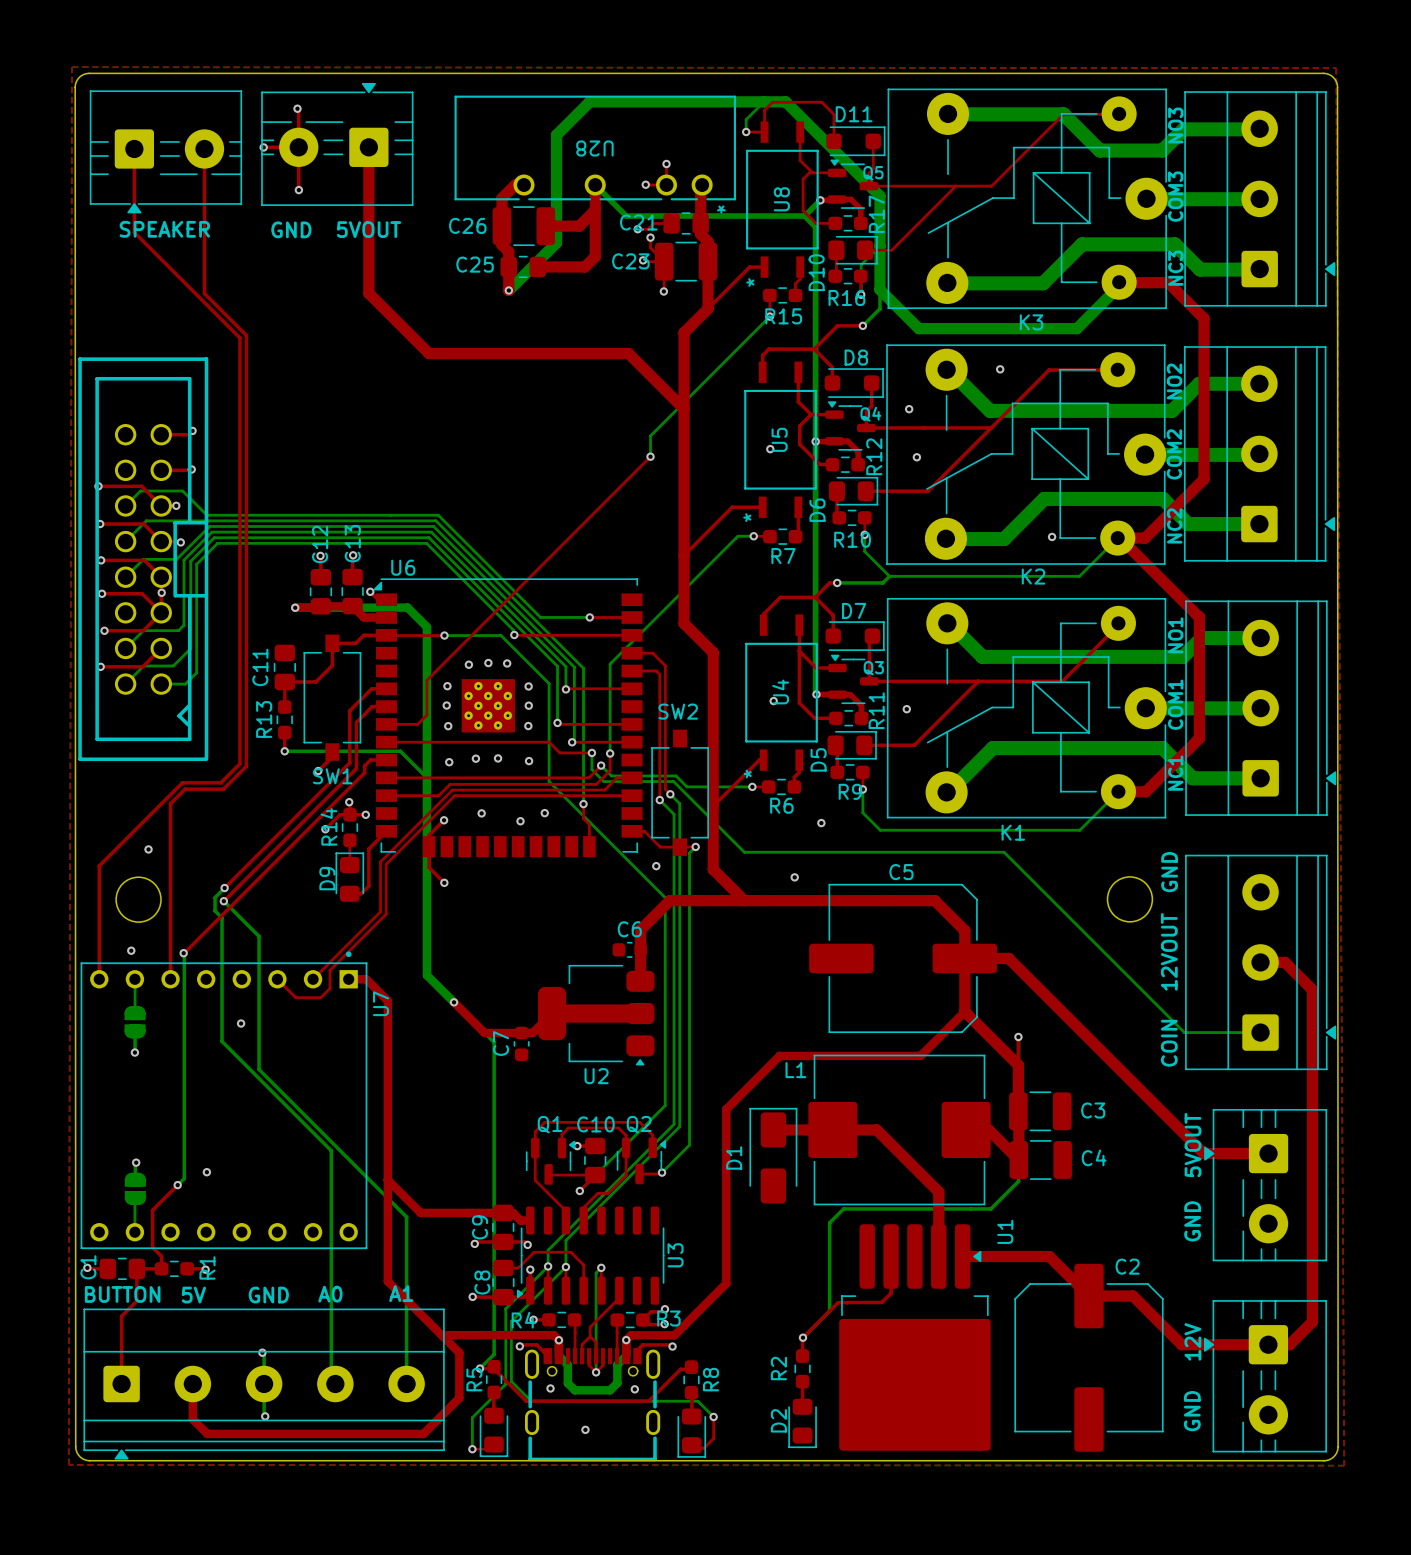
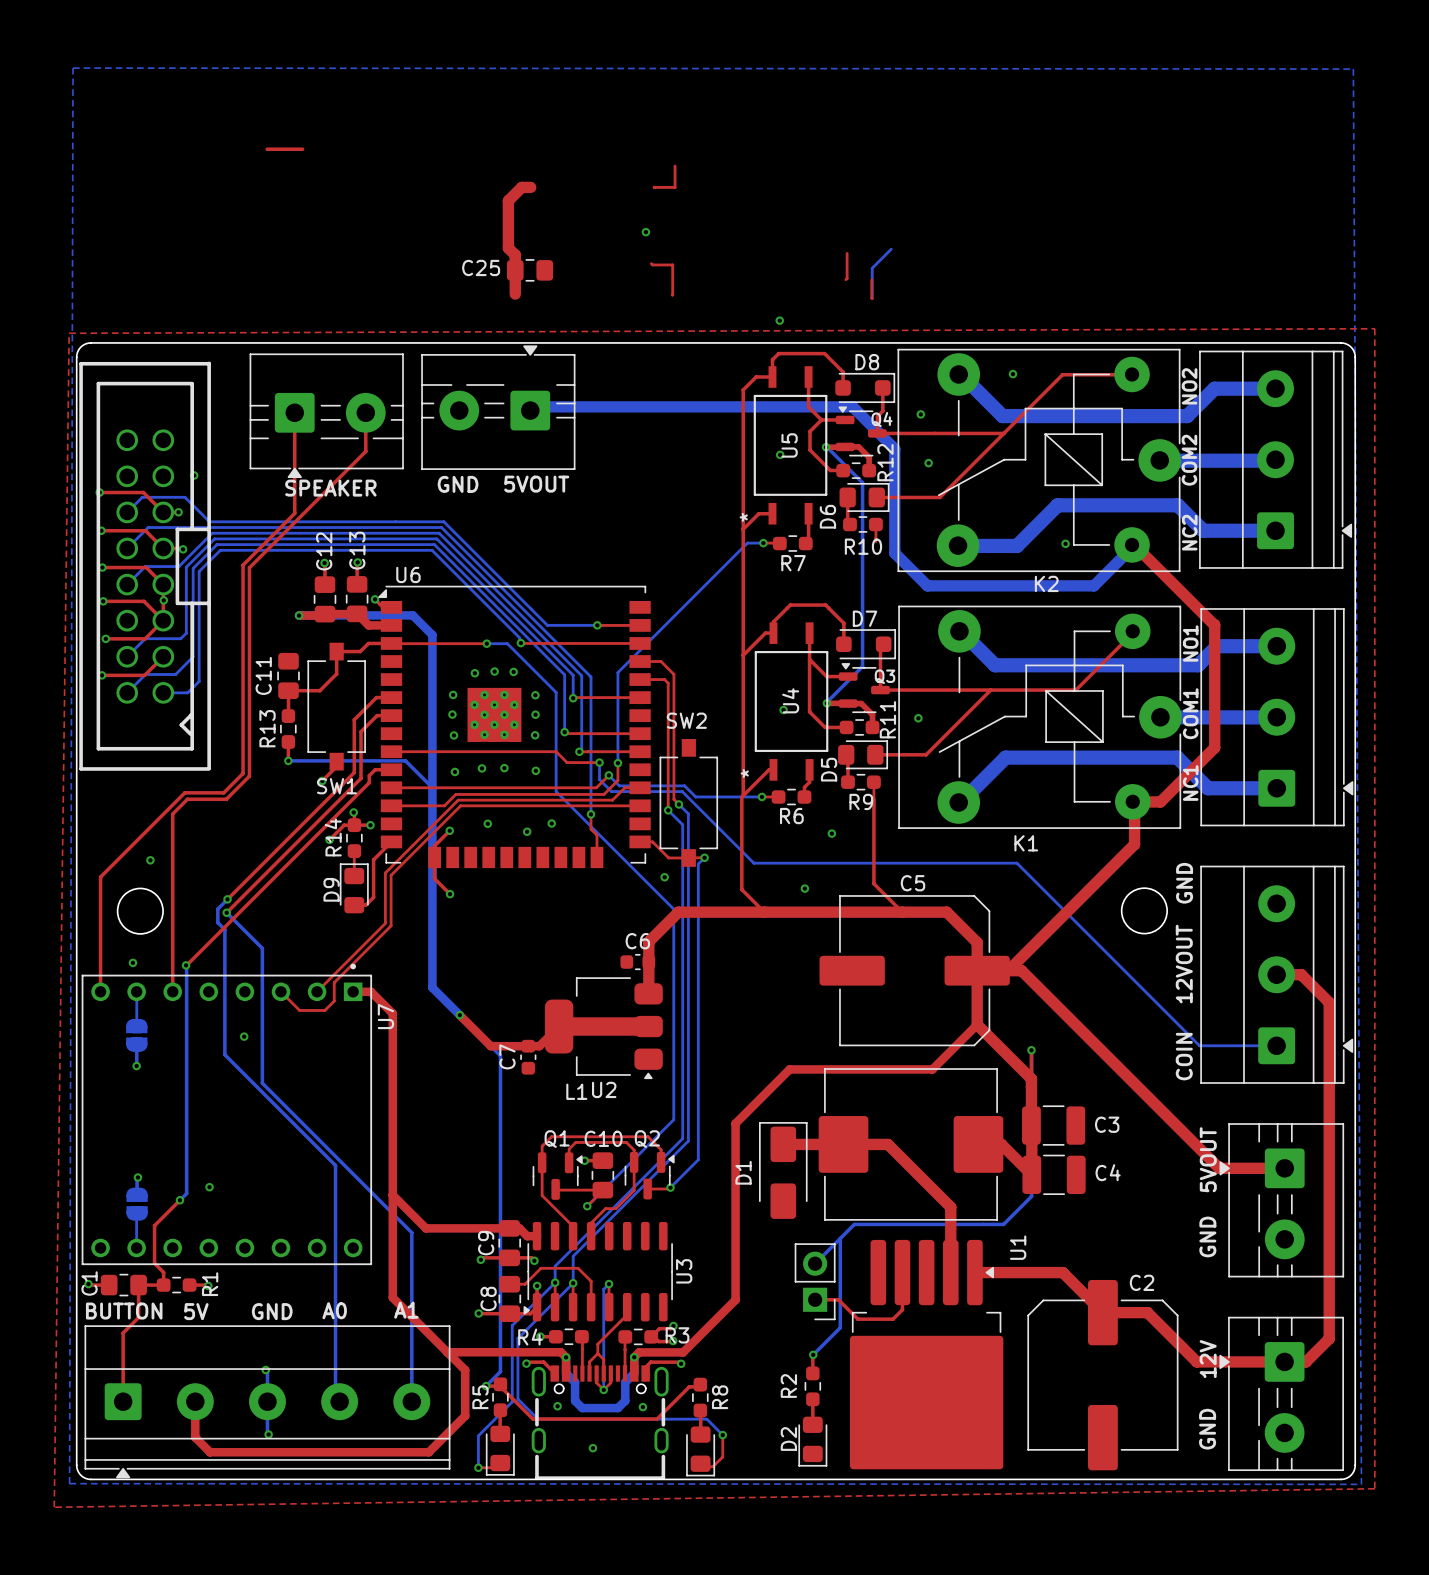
top zone outline: (72, 67) (1336, 68) (1344, 1465) (68, 1464) (72, 67) -> (1374, 328) (69, 333) (54, 1507) (1374, 1488) (1374, 328)
bottom track: (764, 101) (746, 119) (746, 132) -> none
top track: (297, 108) (298, 189) -> none
via: (297, 108) -> none
bottom track: (948, 113) (1063, 114) (1099, 150) (1162, 150) (1183, 129) (1259, 128) -> none
top track: (1119, 113) (1063, 114) (991, 186) (868, 186) (868, 173) (873, 168) (873, 141) -> none
text: NO3 (1175, 125) -> none
top track: (746, 132) (764, 132) (764, 110) (772, 102) (821, 102) (833, 114) (833, 141) -> none
via: (746, 132) -> none
top track: (800, 132) (800, 160) (812, 172) -> none
D11: (855, 141) -> none
part: (337, 144) -> none
via: (263, 147) -> none
top track: (368, 147) (368, 293) (429, 353) (628, 353) (684, 409) -> none
U28: (595, 147) -> none
top track: (134, 148) (134, 232) (239, 338) (239, 558) -> (294, 412) (294, 513) (243, 565)
top track: (204, 148) (204, 293) (246, 335) (246, 560) -> (365, 412) (365, 451) (249, 567)
part: (165, 151) -> none
via: (666, 163) -> none
top track: (836, 172) (809, 172) (803, 179) (803, 210) (815, 223) (835, 223) -> none
via: (645, 184) -> none
Q5: (852, 184) -> none
top track: (595, 185) (595, 256) (585, 266) (537, 266) -> none
bottom track: (595, 185) (626, 216) (804, 216) -> none
top track: (702, 185) (700, 233) (708, 241) (708, 308) -> none
top track: (955, 186) (891, 250) (865, 250) -> none
via: (298, 190) -> none
text: COM3 (1175, 196) -> none
K3: (1027, 198) -> none
bottom track: (1146, 198) (1259, 198) -> none
part: (1259, 198) -> none
U8: (782, 199) -> none
top track: (820, 200) (851, 199) (860, 209) (860, 223) -> none
bottom track: (820, 200) (804, 216) -> none
via: (820, 200) -> none
top track: (595, 210) (579, 226) (545, 226) -> none
bottom track: (804, 216) (815, 226) (816, 694) -> none
top track: (671, 223) (653, 223) (648, 229) (637, 229) -> none
C21: (686, 223) -> none
R17: (848, 223) -> none
C26: (523, 226) -> none
text position: SPEAKER (164, 229) -> SPEAKER (330, 488)
text position: GND (291, 229) -> GND (458, 484)
text position: 5VOUT (369, 229) -> 5VOUT (536, 484)
top track: (650, 237) (650, 247) (664, 261) -> none
via: (650, 237) -> none
D10: (853, 250) -> none
via: (643, 260) -> none
C23: (686, 261) -> none
top track: (764, 267) (749, 267) (708, 308) -> none
top track: (800, 267) (800, 279) (795, 283) (795, 295) -> none
text: NC3 (1175, 268) -> none
bottom track: (1259, 269) (1200, 269) (1174, 244) (1082, 244) (1043, 283) (947, 282) -> none
R16: (848, 276) -> none
top track: (1119, 282) (1168, 282) (1204, 318) (1204, 479) (1145, 538) (1119, 538) -> none
bottom track: (1119, 282) (1120, 285) (1076, 328) (918, 328) (879, 289) -> none
bottom track: (879, 289) (879, 308) (862, 325) -> none
bottom track: (879, 289) (879, 196) (785, 101) (589, 101) (556, 135) (556, 242) (508, 290) -> none
via: (508, 290) -> none
via: (663, 291) -> none
via: (861, 294) -> none
top track: (769, 295) (769, 316) -> none
R15: (782, 295) -> none
top track: (708, 308) (684, 332) (684, 623) (713, 652) (713, 869) (744, 900) -> none
bottom track: (769, 316) (650, 435) (650, 456) -> none
top track: (862, 325) (837, 325) (814, 349) -> none
via: (862, 325) -> none
top track: none -> (772, 376) (756, 376) (743, 389) (743, 795)
part: none -> (498, 407)
part: none -> (326, 415)
top track: (192, 430) (188, 434) (161, 434) -> none
via: (192, 430) -> none
bottom track: none -> (827, 447) (862, 482) (862, 666) (826, 702)
top track: (650, 456) (426, 680) (426, 715) (417, 724) (386, 724) -> none
via: (650, 456) -> none
top track: (191, 469) (161, 470) -> none
top track: (749, 507) (732, 507) (684, 555) -> (758, 513) (743, 529)
U5 text position: * (747, 517) -> * (743, 517)
bottom track: (864, 534) (864, 551) (889, 576) -> none
via: (864, 534) -> none
bottom track: (1117, 538) (1079, 576) (889, 576) -> (1132, 544) (1132, 547) (1093, 585) (927, 585) (894, 553) (894, 448) (852, 406) (533, 406) (530, 410)
bottom track: (889, 576) (882, 582) (837, 582) -> none
top track: (837, 582) (829, 582) (815, 597) -> none
via: (837, 582) -> none
top track: none -> (773, 633) (765, 633) (743, 655)
top track: none -> (450, 643) (486, 643)
bottom track: (444, 635) (480, 635) -> none
via position: (444, 635) -> (486, 643)
U4 text position: * (747, 773) -> * (744, 773)
top track: (732, 787) (713, 804) -> (741, 797) (741, 889) (764, 912)
top track: none -> (873, 799) (873, 883) (902, 912)
bottom track: (862, 789) (862, 812) (880, 830) (1079, 830) (1118, 791) -> none
via: (862, 789) -> none
top track: none -> (1132, 801) (1134, 803) (1134, 844) (1008, 970)
L1 name position: L1 (795, 1070) -> L1 (576, 1091)
bottom track: none -> (840, 1238) (815, 1263)
part: none -> (815, 1281)
top track: (847, 1302) (838, 1302) (802, 1337) -> (858, 1319) (838, 1299) (815, 1299)
board edge: (75, 1446) (75, 87) (79, 77) (89, 73) (1323, 73) (1333, 77) (1337, 87) (1338, 1446) -> (76, 1465) (76, 357) (80, 347) (90, 342) (1341, 342) (1349, 346) (1355, 357) (1355, 1465)

